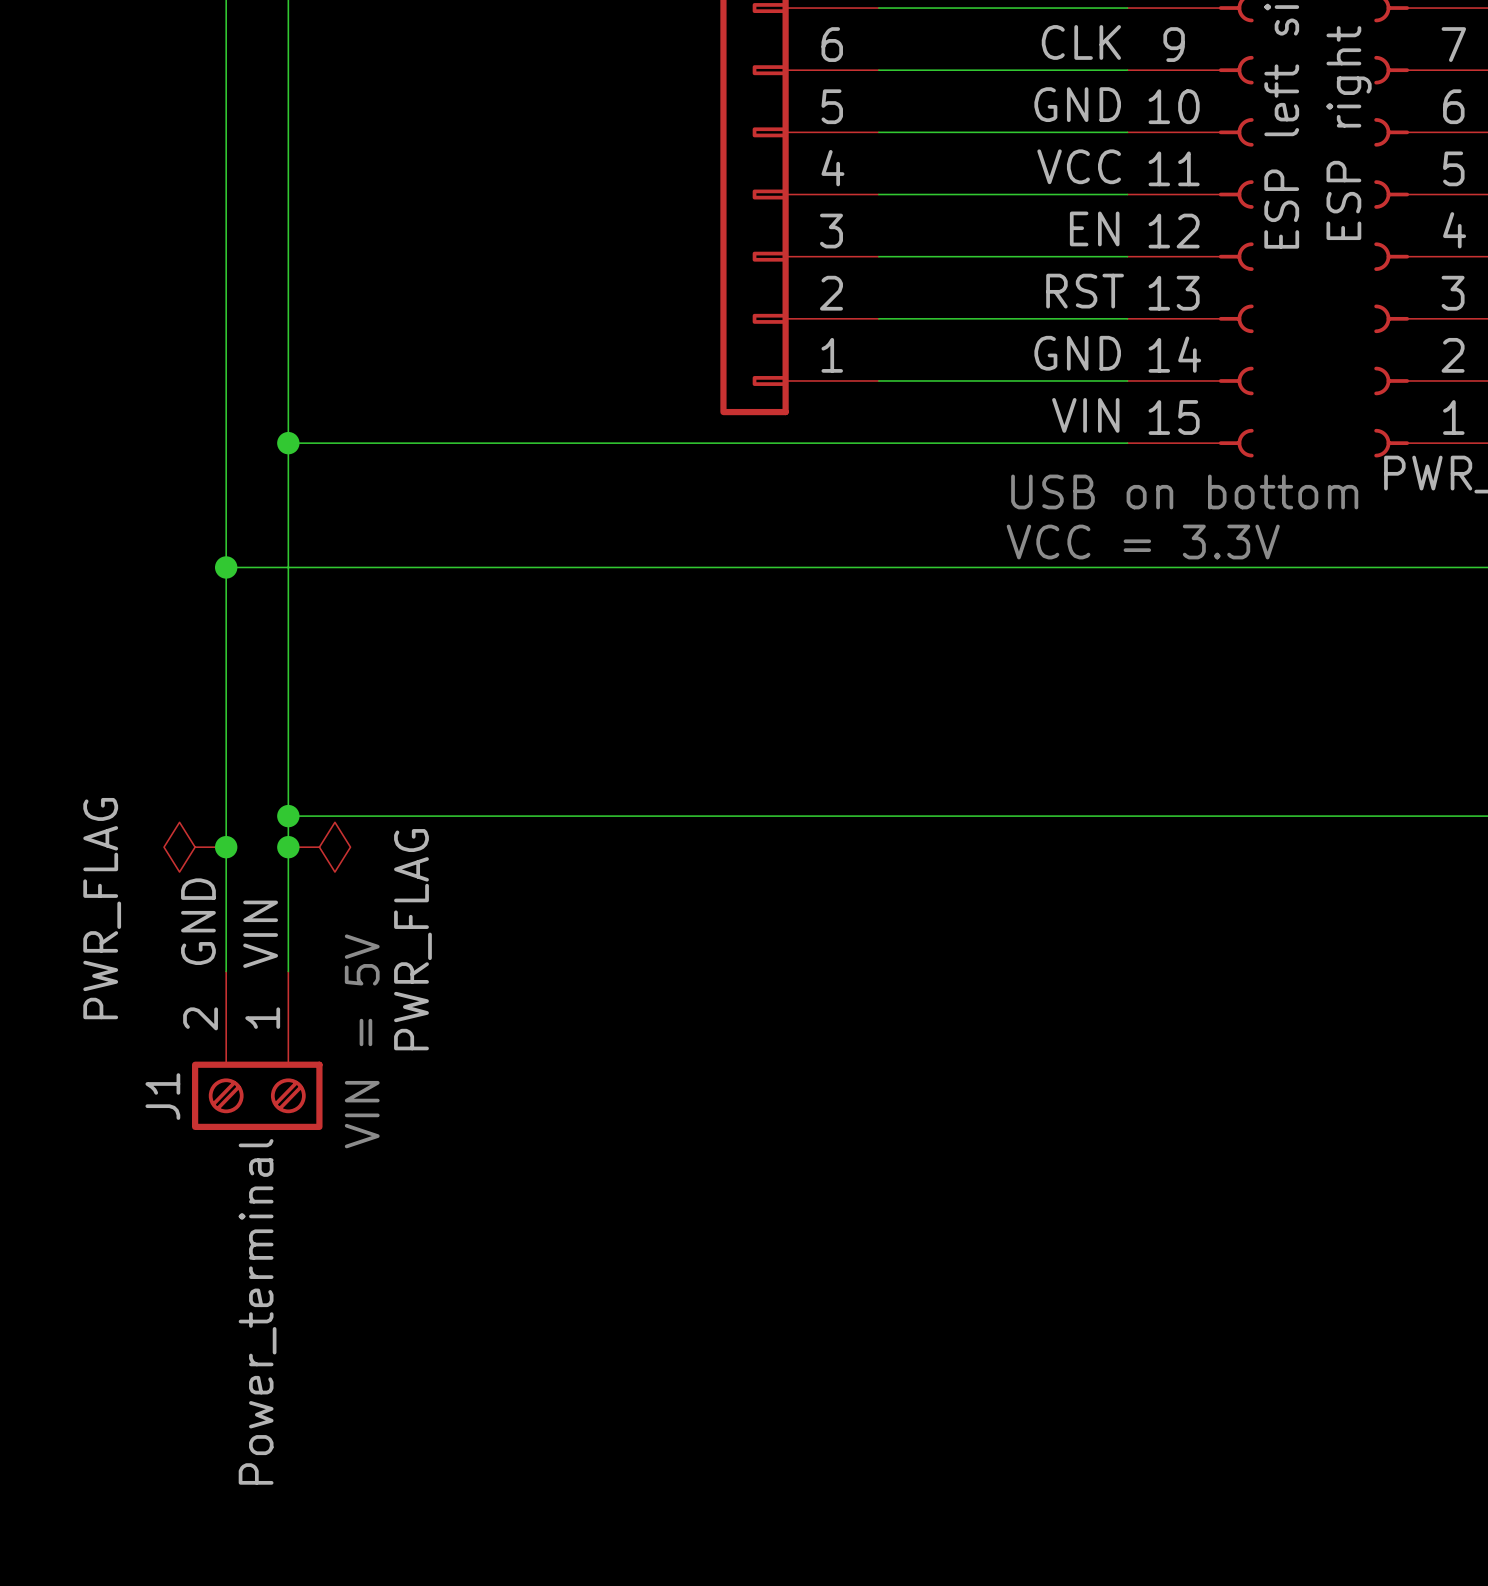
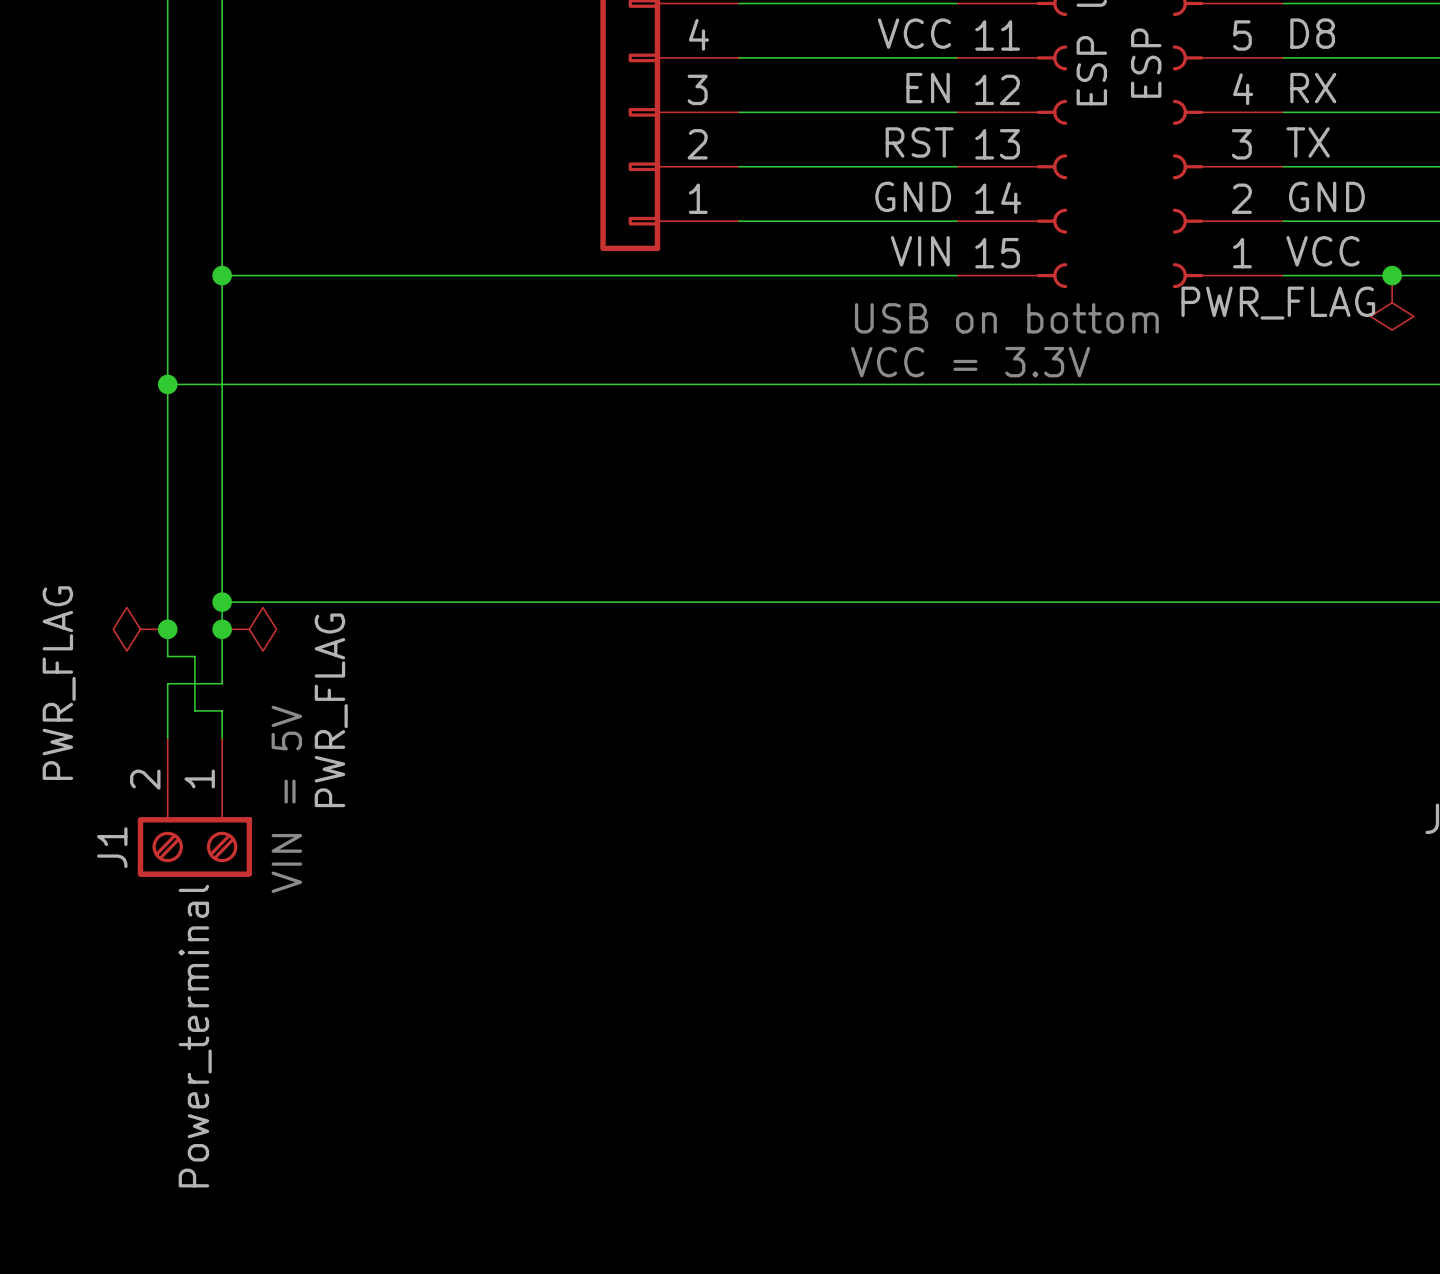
wire: (226, 878) (226, 909) -> (167, 656) (194, 656) (194, 710) (222, 710)
wire: (288, 909) (288, 940) -> (222, 683) (167, 683)
label: GND (198, 921) -> none
label: VIN (260, 934) -> none

